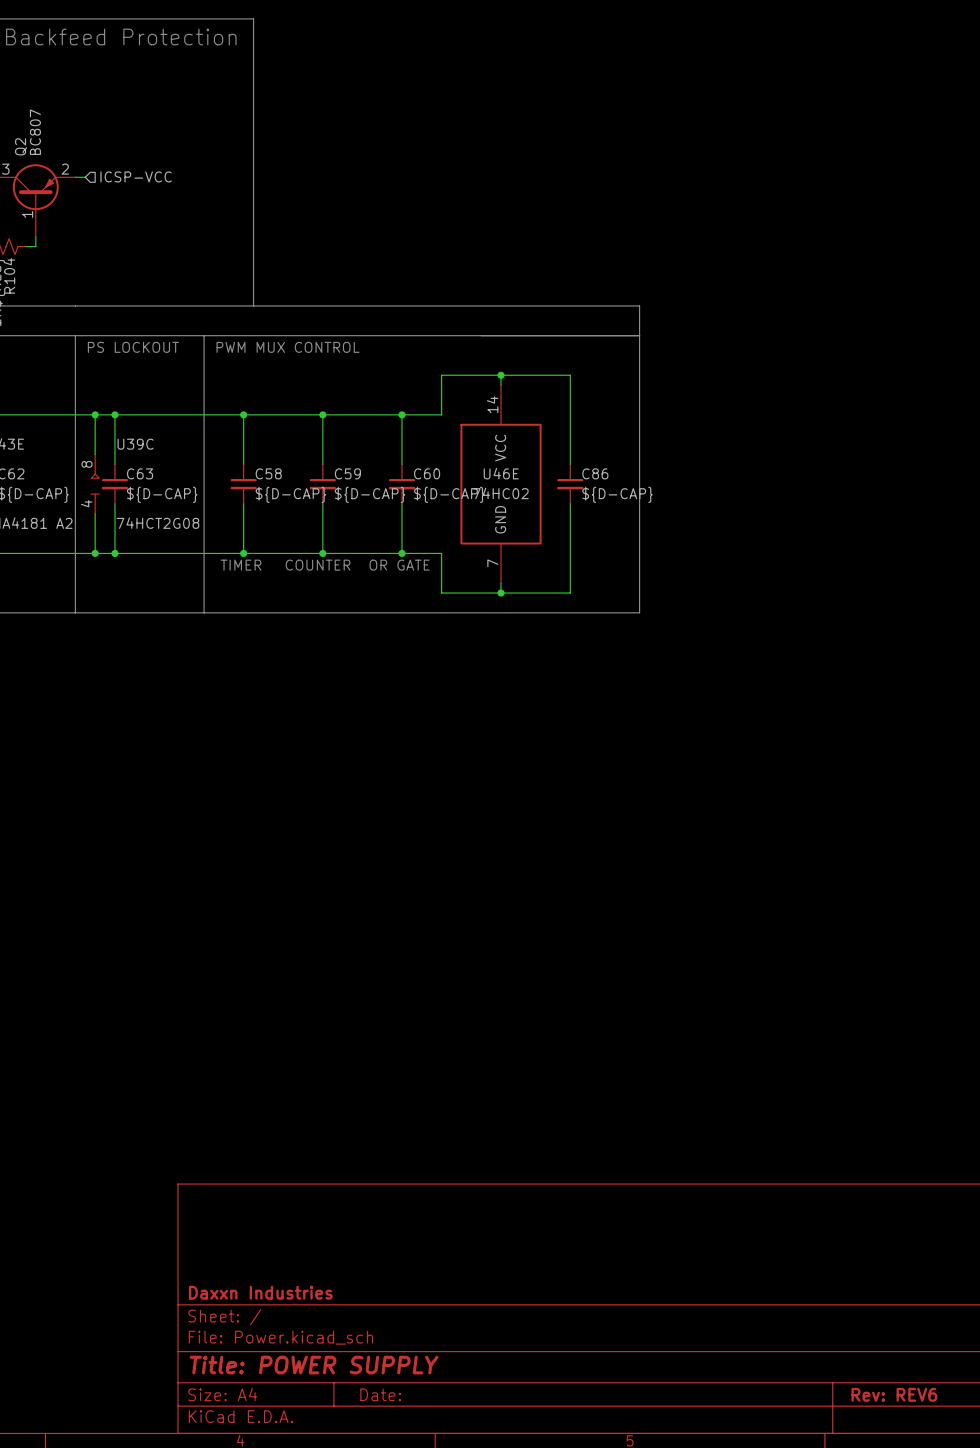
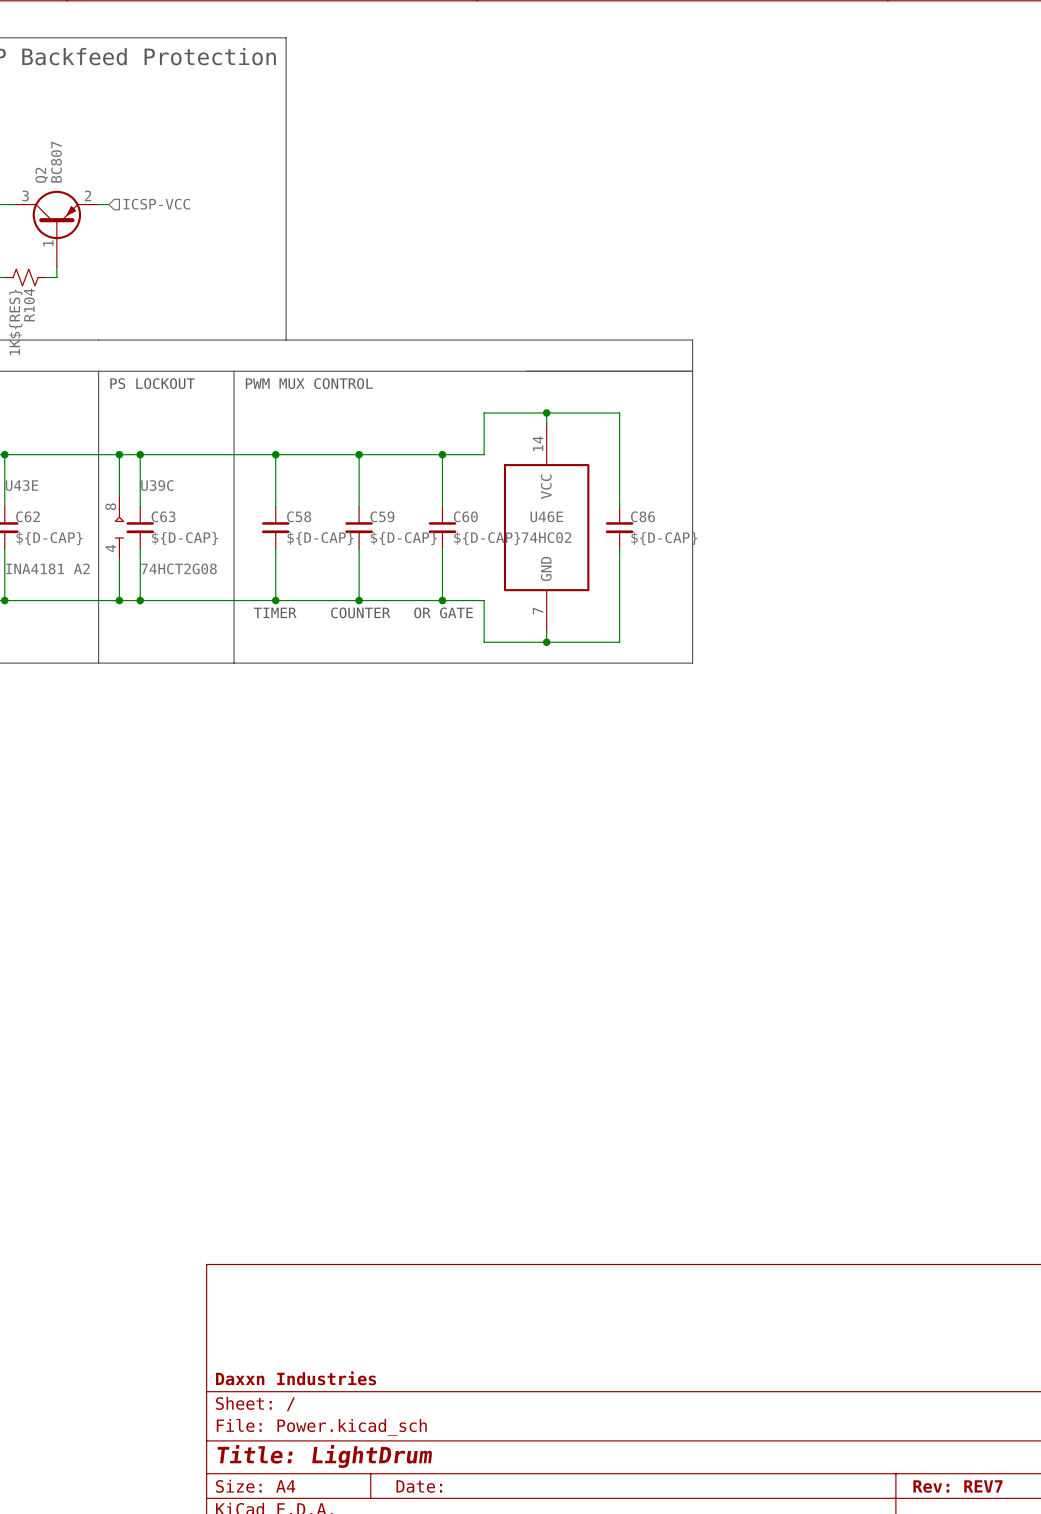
title block: Title: POWER SUPPLY (314, 1365) -> Title: LightDrum (324, 1456)
title block: Rev: REV6 (894, 1394) -> Rev: REV7 (957, 1486)

